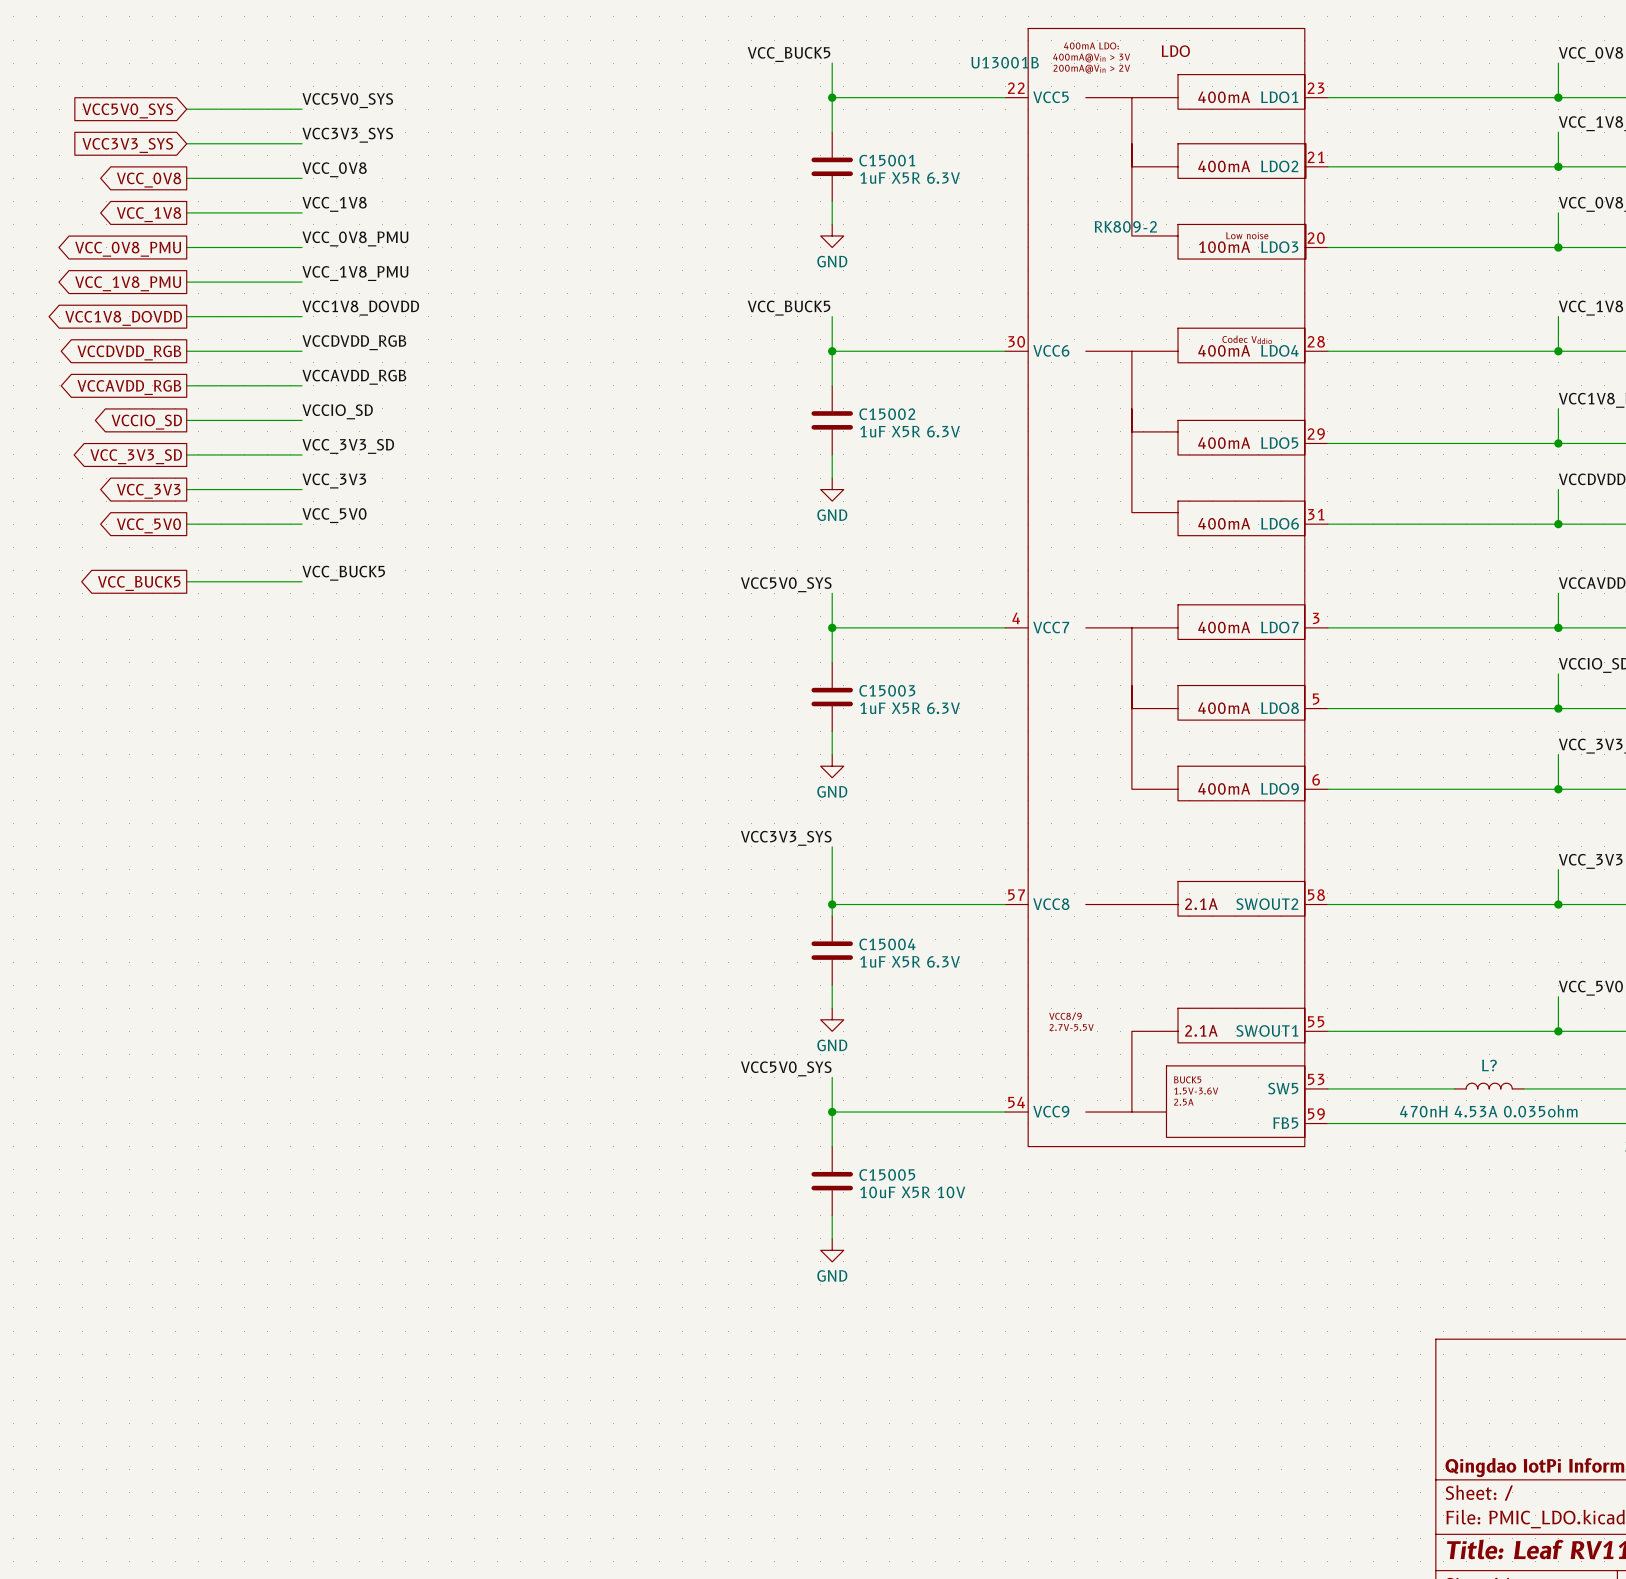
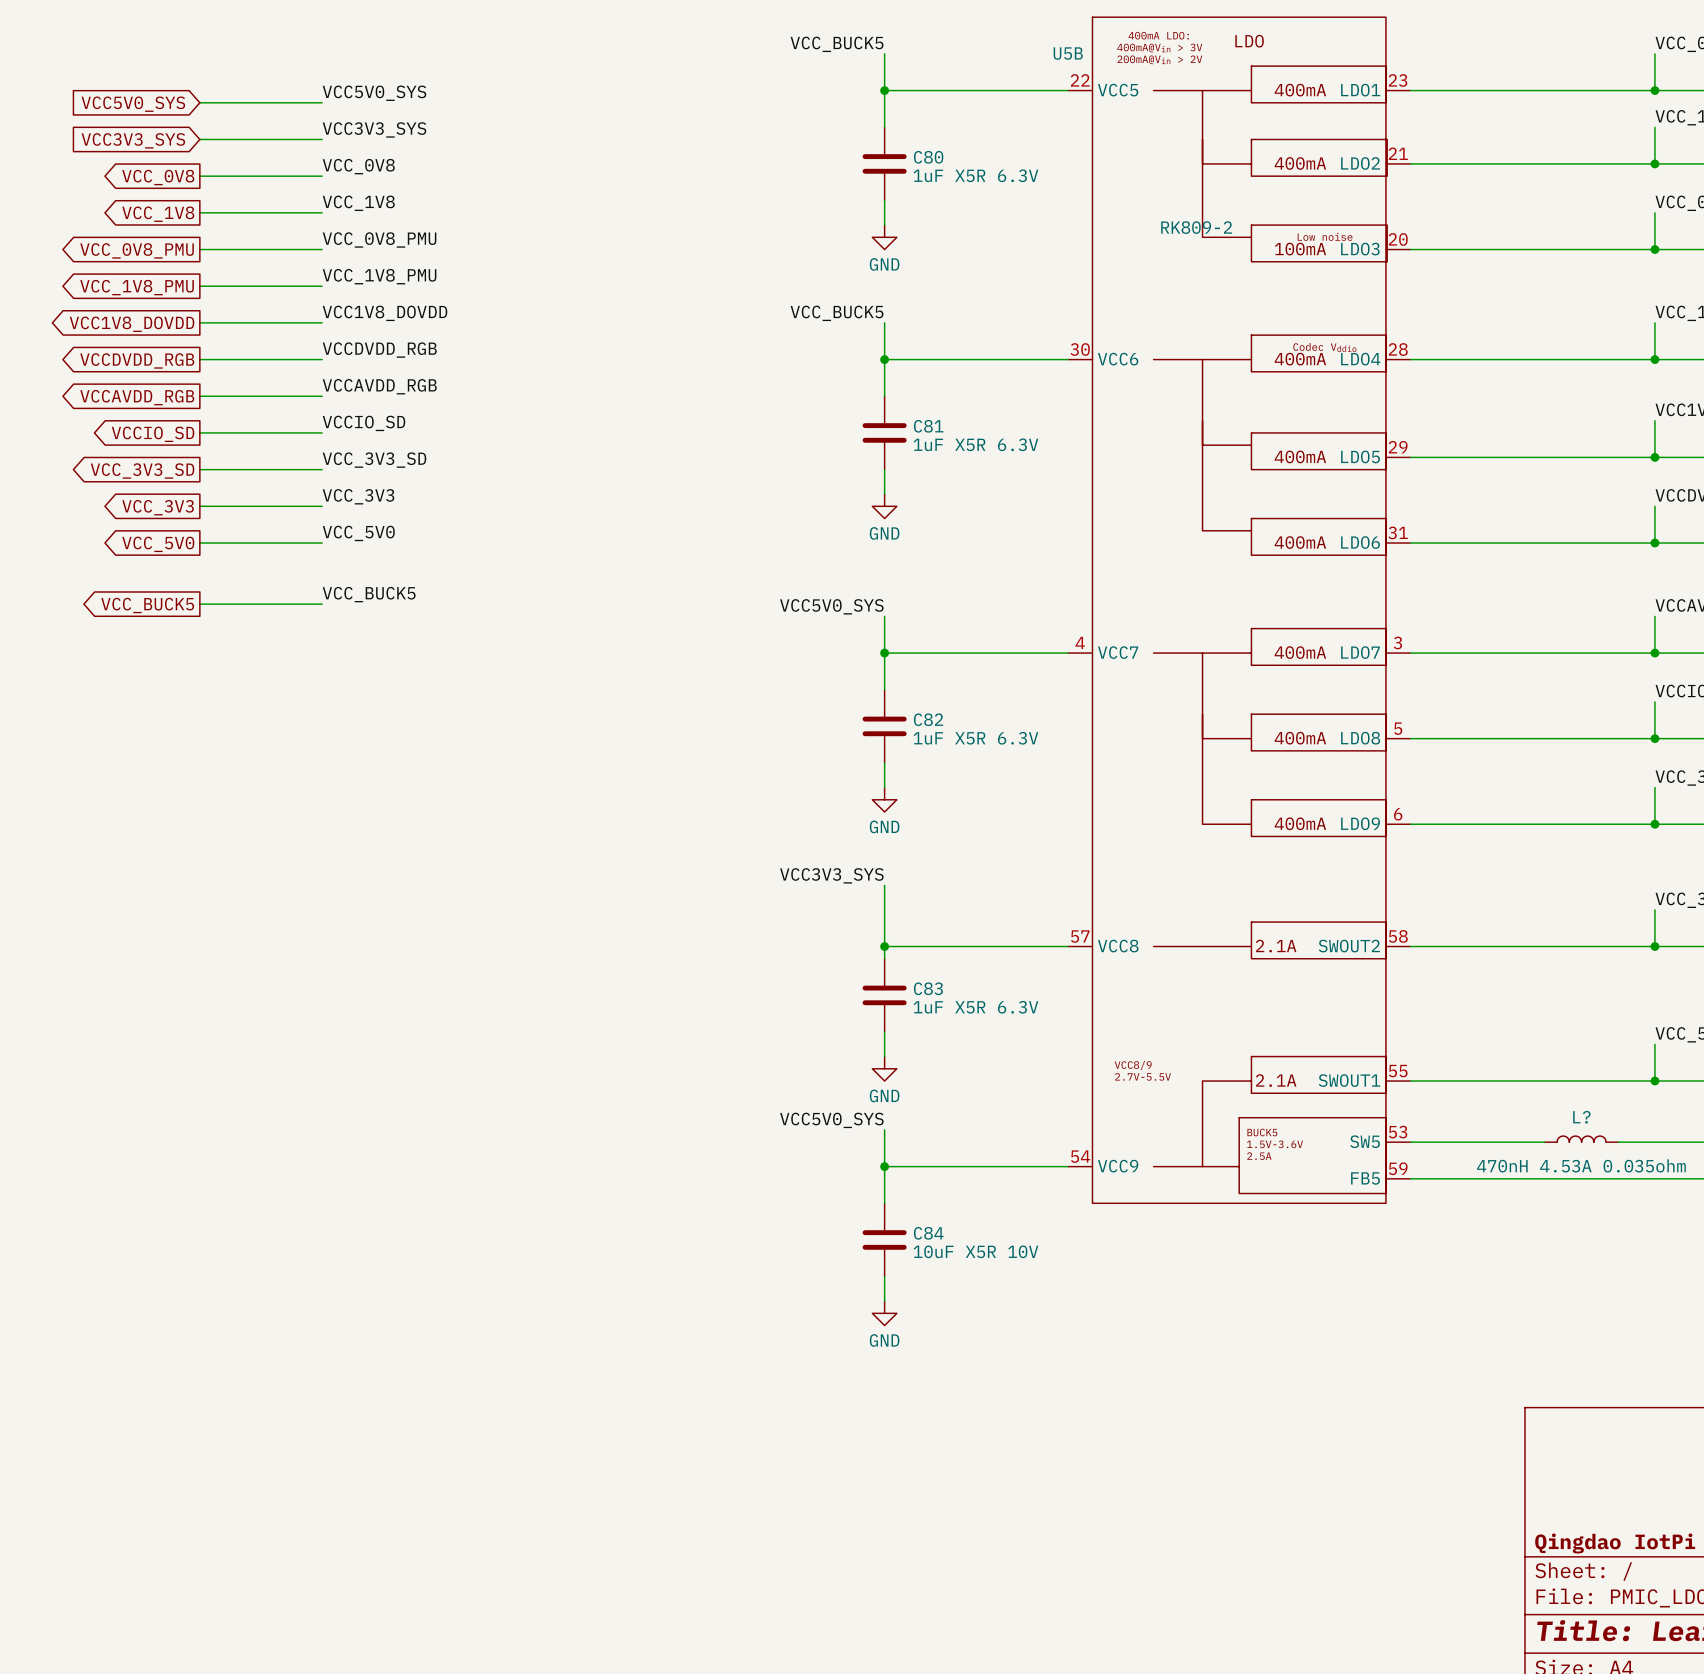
U13001B name: U13001B (1005, 62) -> U5B (1068, 53)
C15001 name: C15001 (887, 160) -> C80 (928, 157)
C15002 name: C15002 (887, 414) -> C81 (928, 426)
C15003 name: C15003 (887, 690) -> C82 (928, 719)
C15004 name: C15004 (887, 944) -> C83 (928, 988)
C15005 name: C15005 (887, 1174) -> C84 (928, 1233)

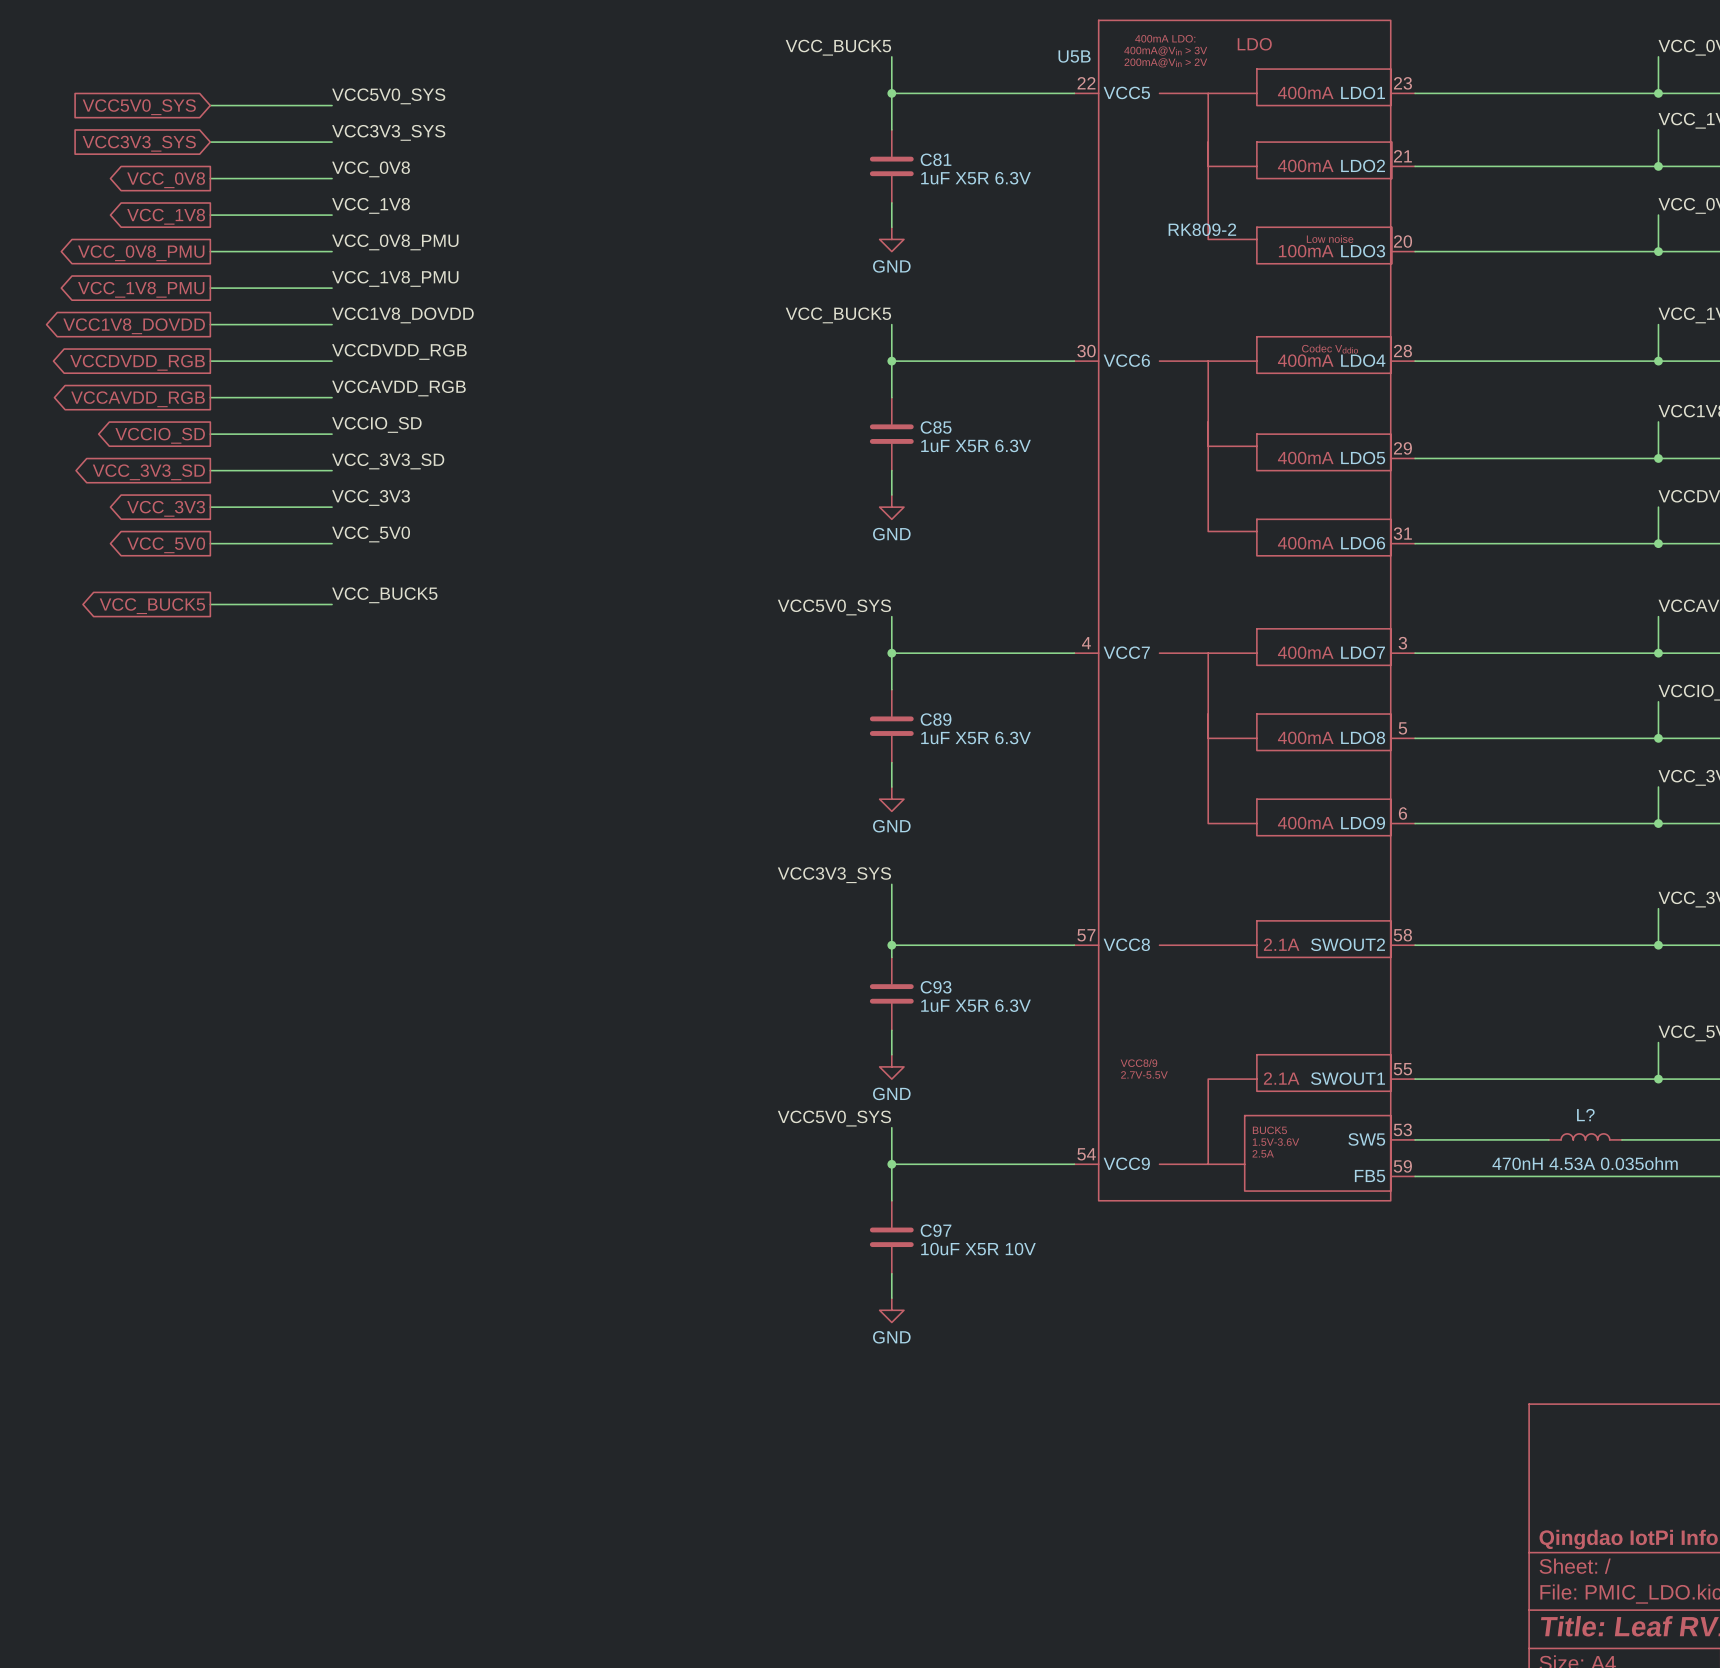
C80 name: C80 (928, 157) -> C81 (936, 159)
C81 name: C81 (928, 426) -> C85 (936, 427)
C82 name: C82 (928, 719) -> C89 (936, 719)
C83 name: C83 (928, 988) -> C93 (936, 987)
C84 name: C84 (928, 1233) -> C97 (936, 1230)

